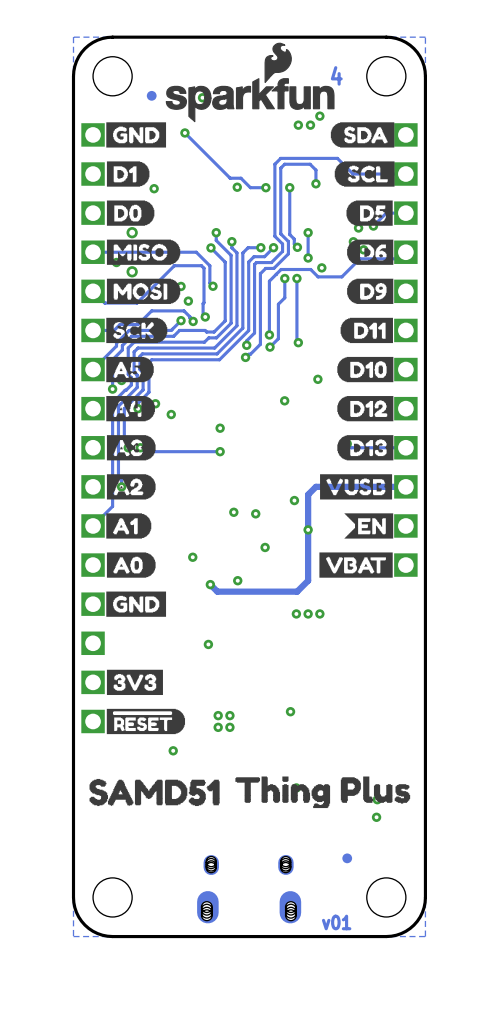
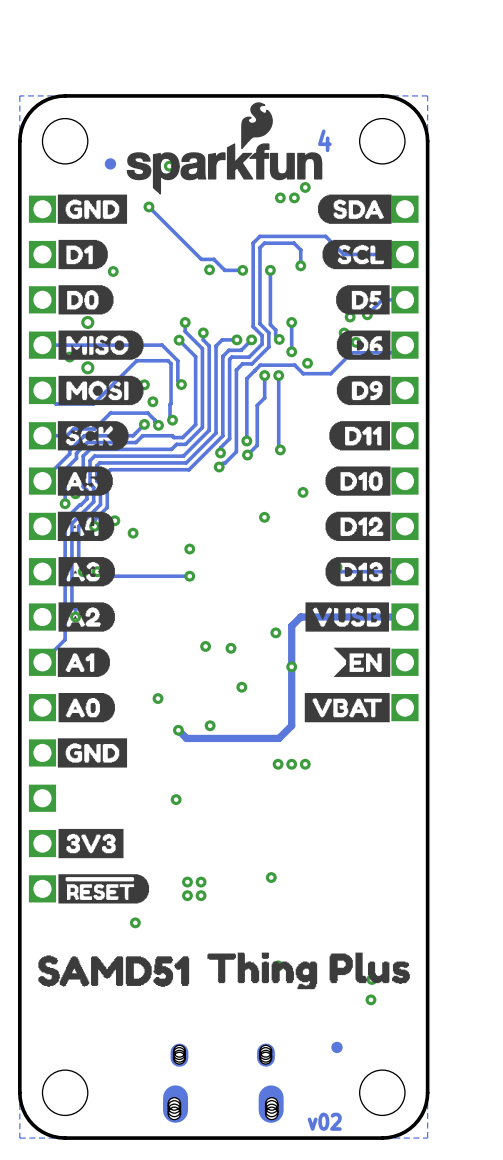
text: v01 (336, 922) -> v02 (324, 1121)

